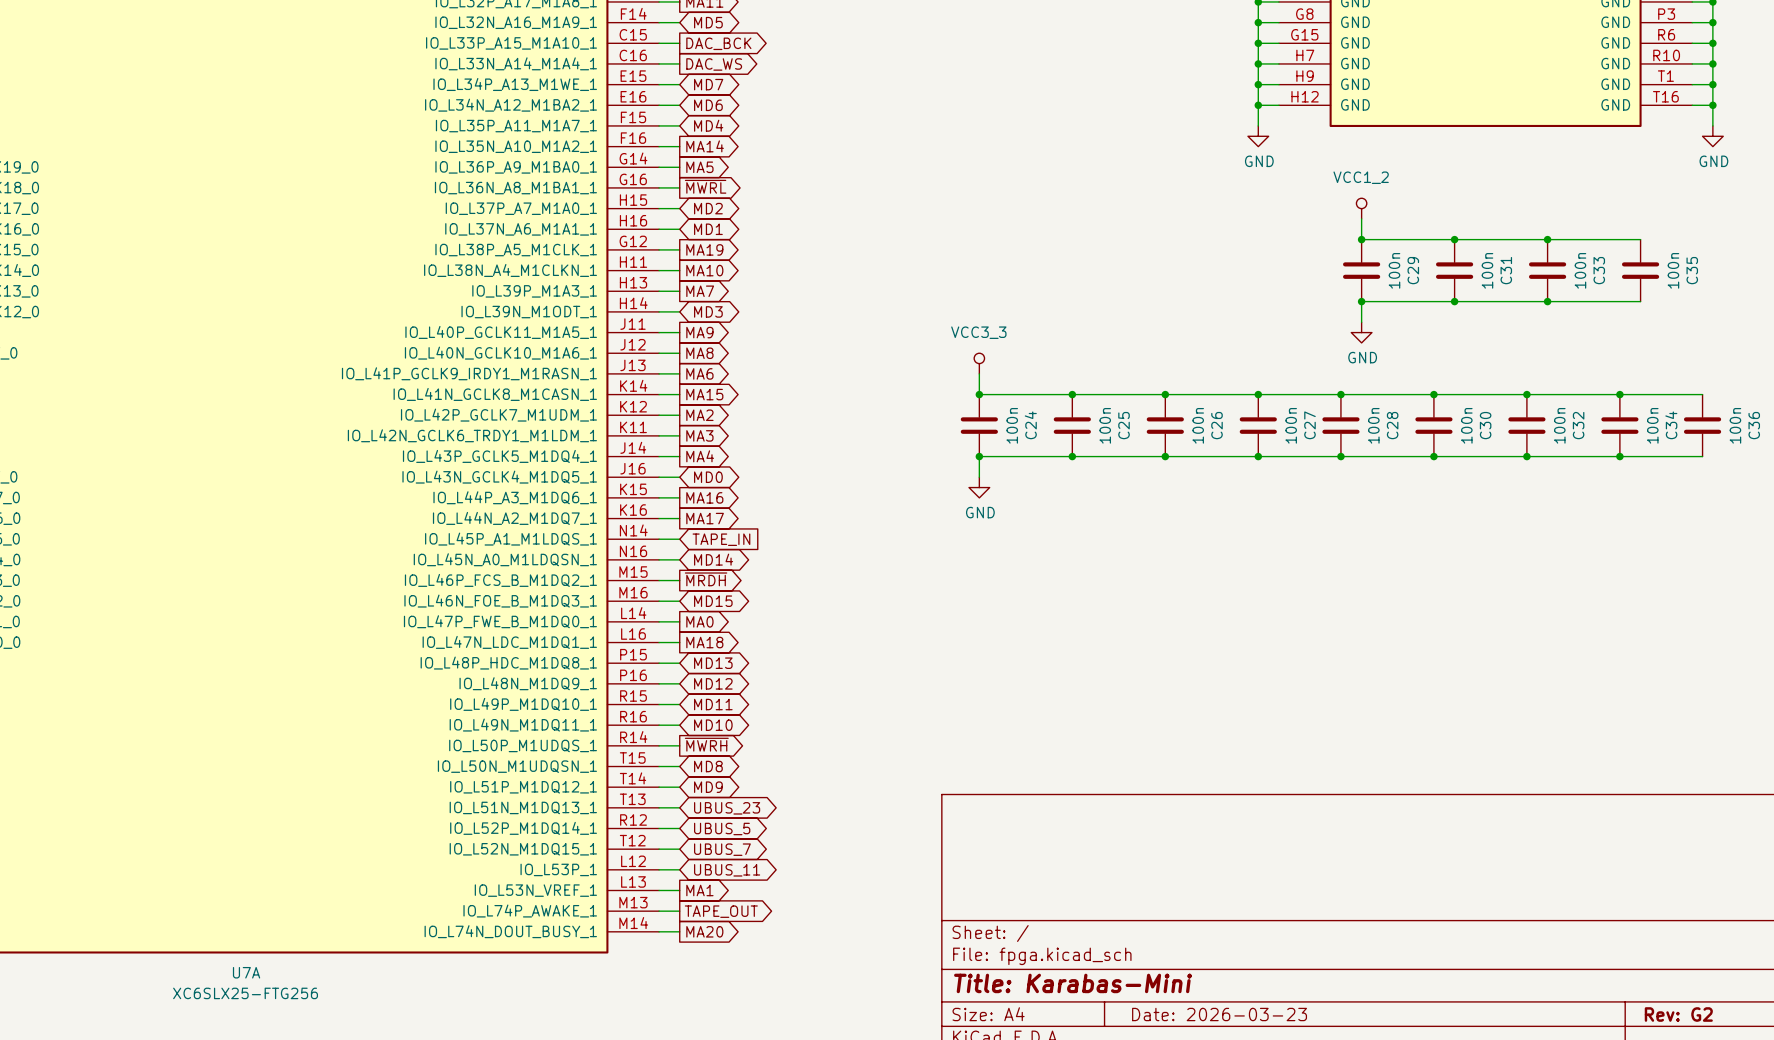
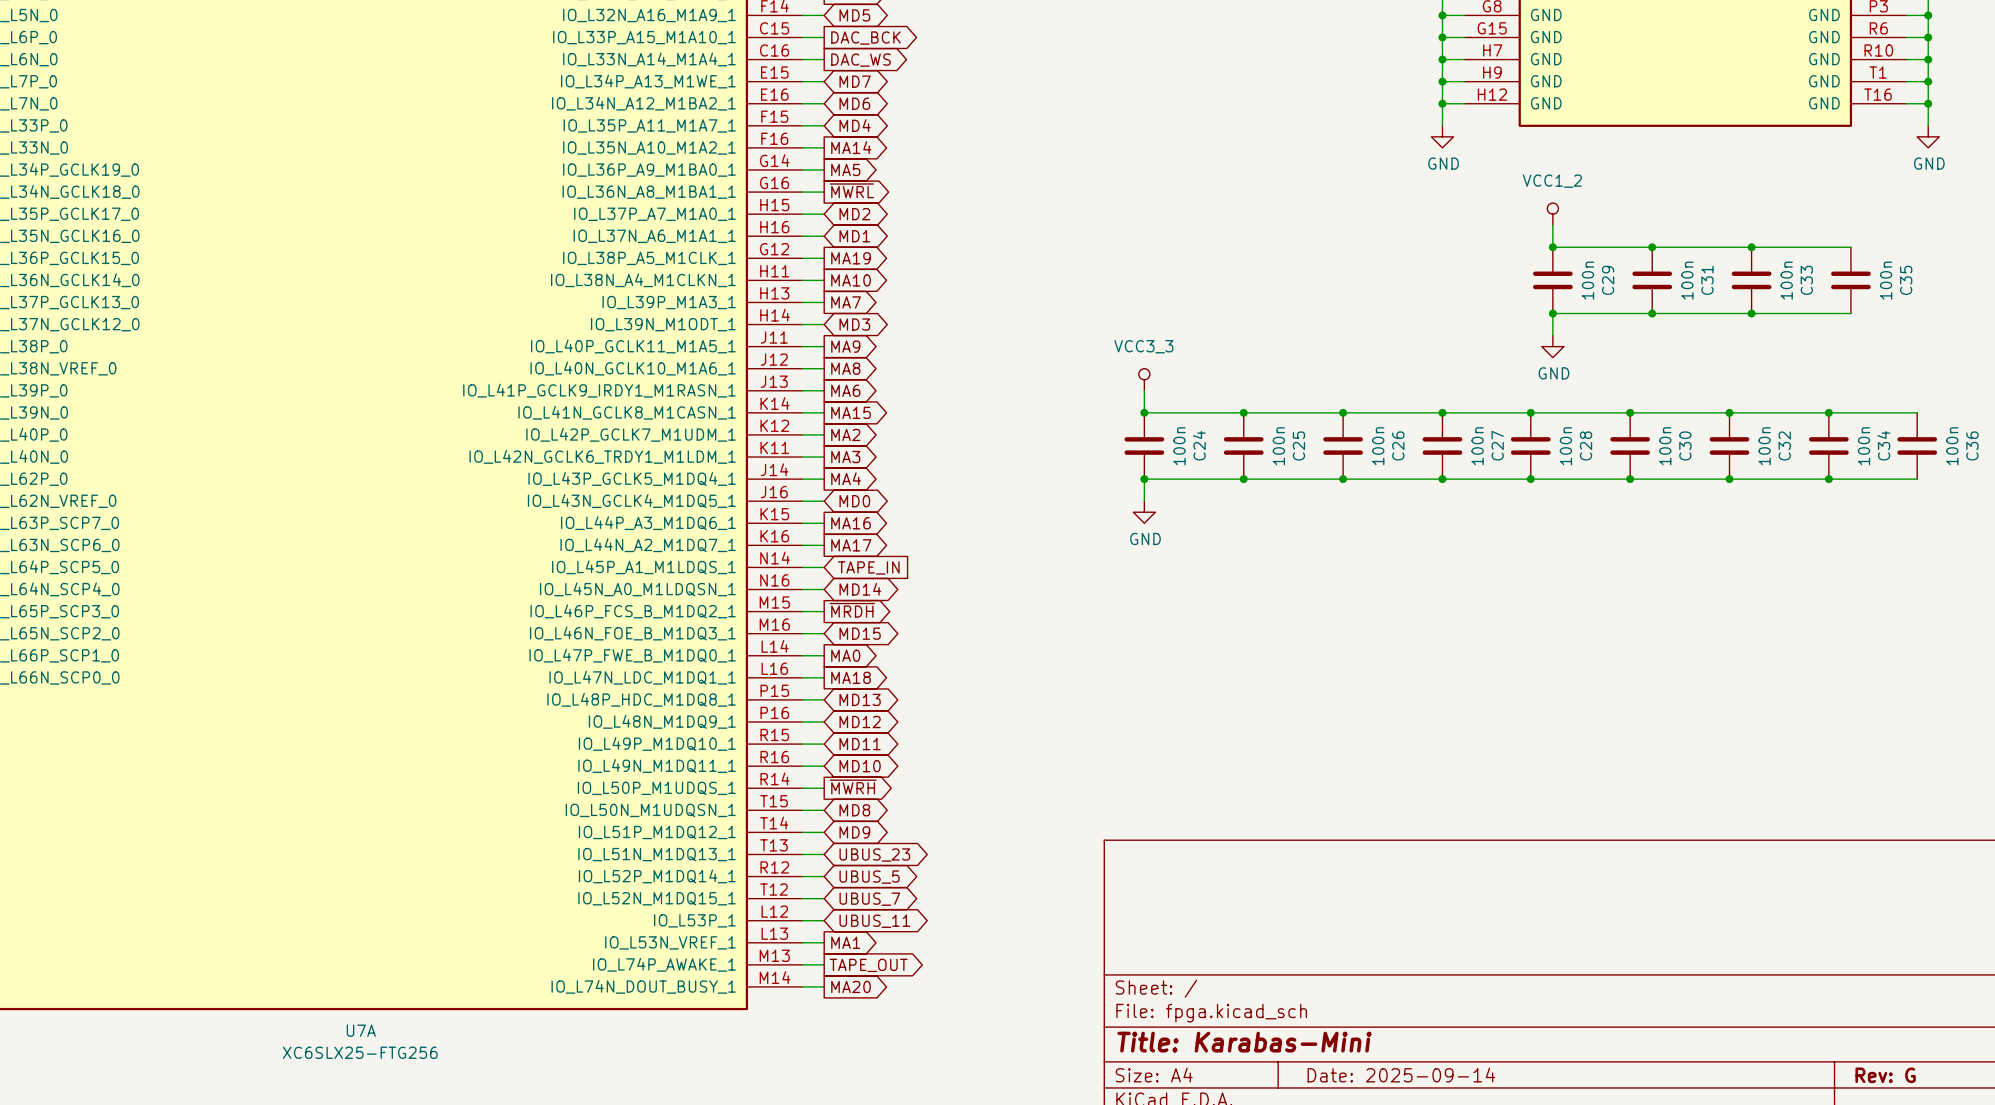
title block: Date: 2026-03-23 (1219, 1014) -> Date: 2025-09-14 (1401, 1075)
title block: Rev: G2 (1678, 1014) -> Rev: G (1885, 1075)

